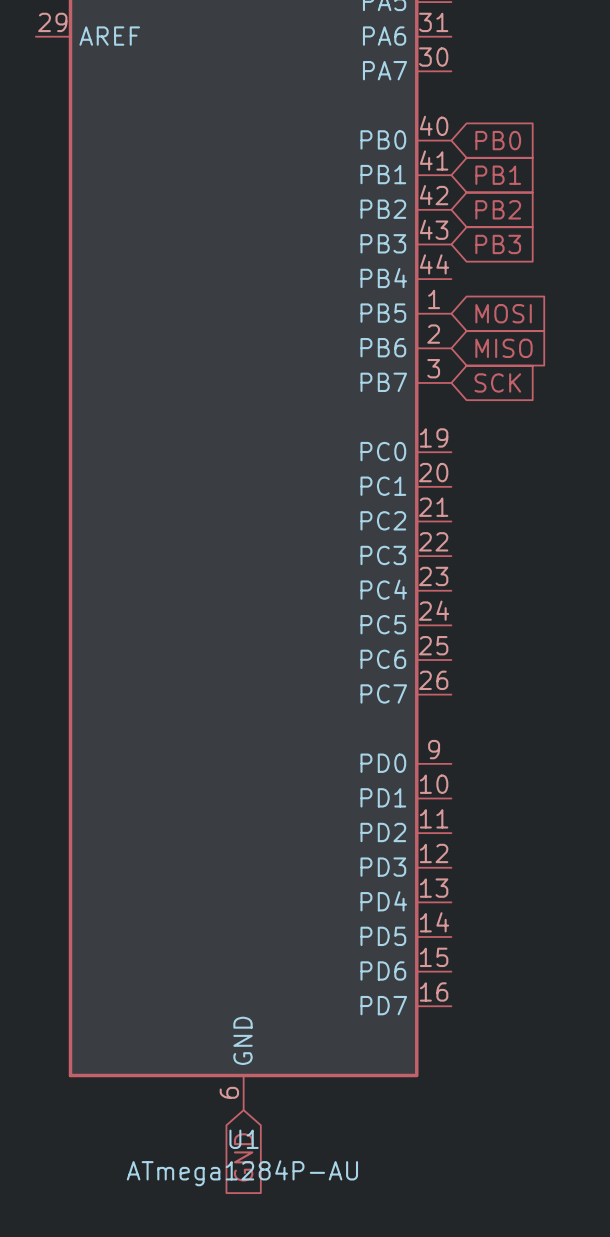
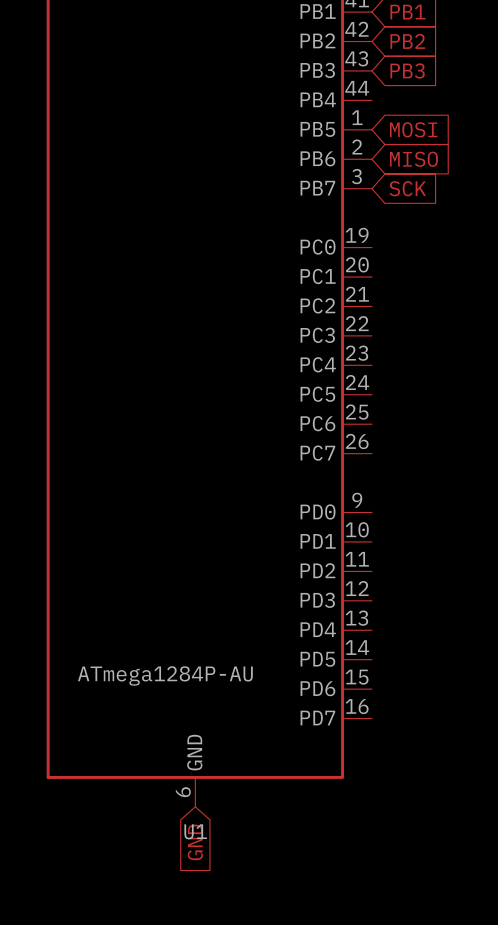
U1 value position: ATmega1284P-AU (242, 1173) -> ATmega1284P-AU (165, 675)

